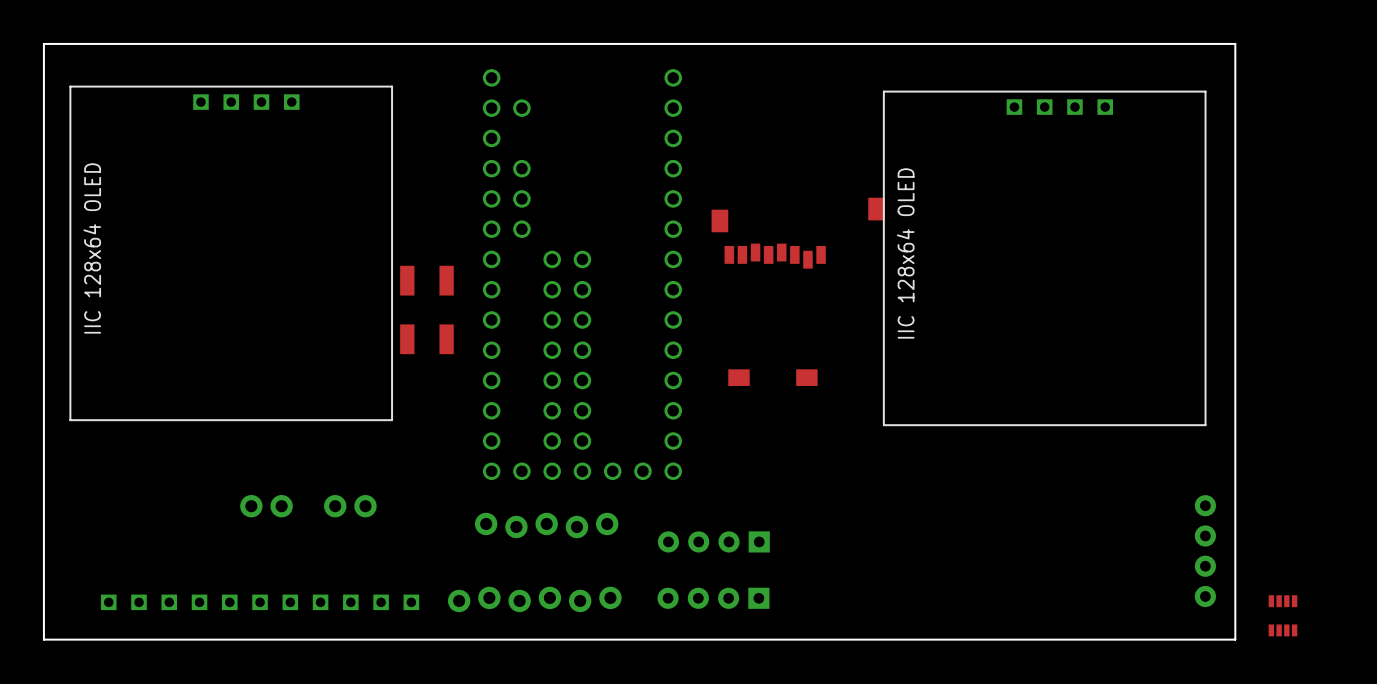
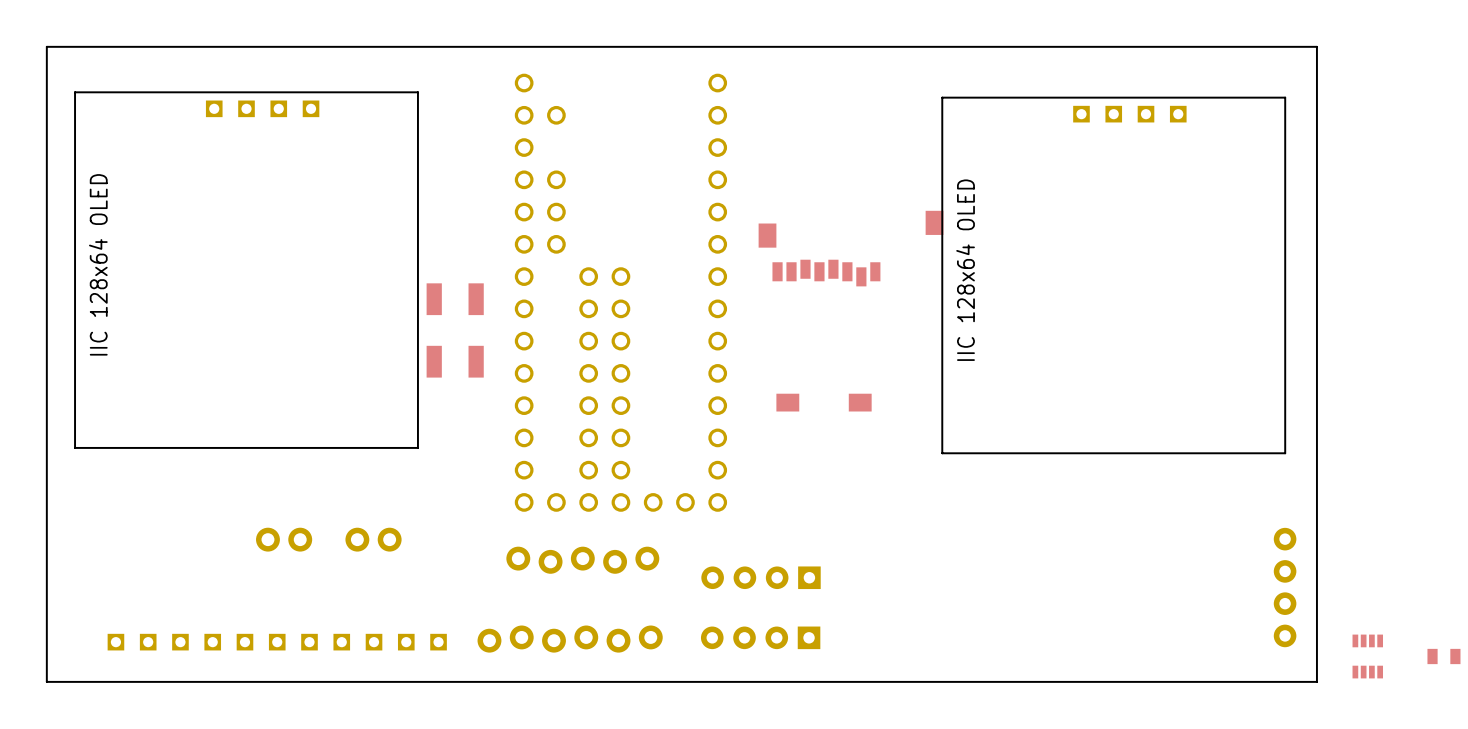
part: none -> (1443, 656)

